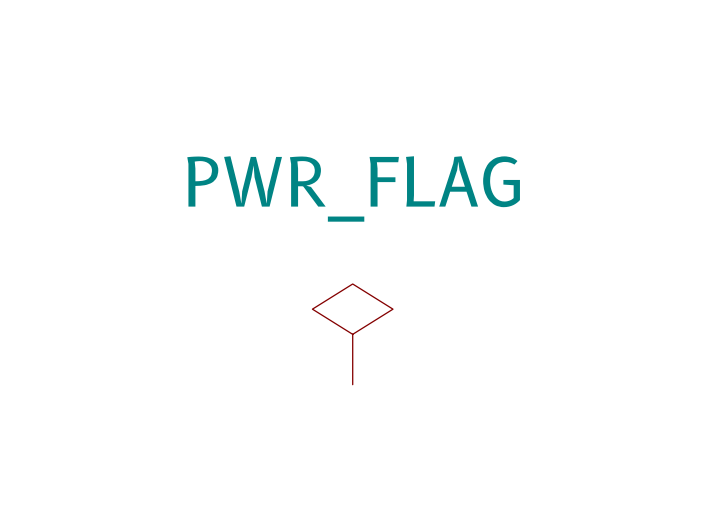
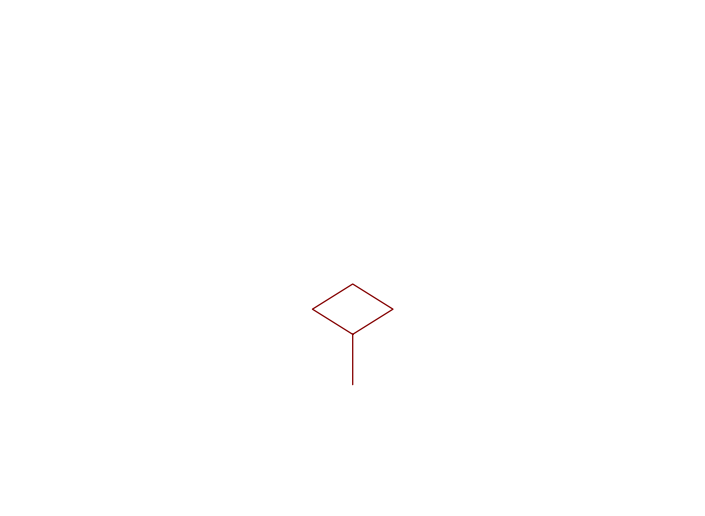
power symbol text: PWR_FLAG (353, 188) -> none

